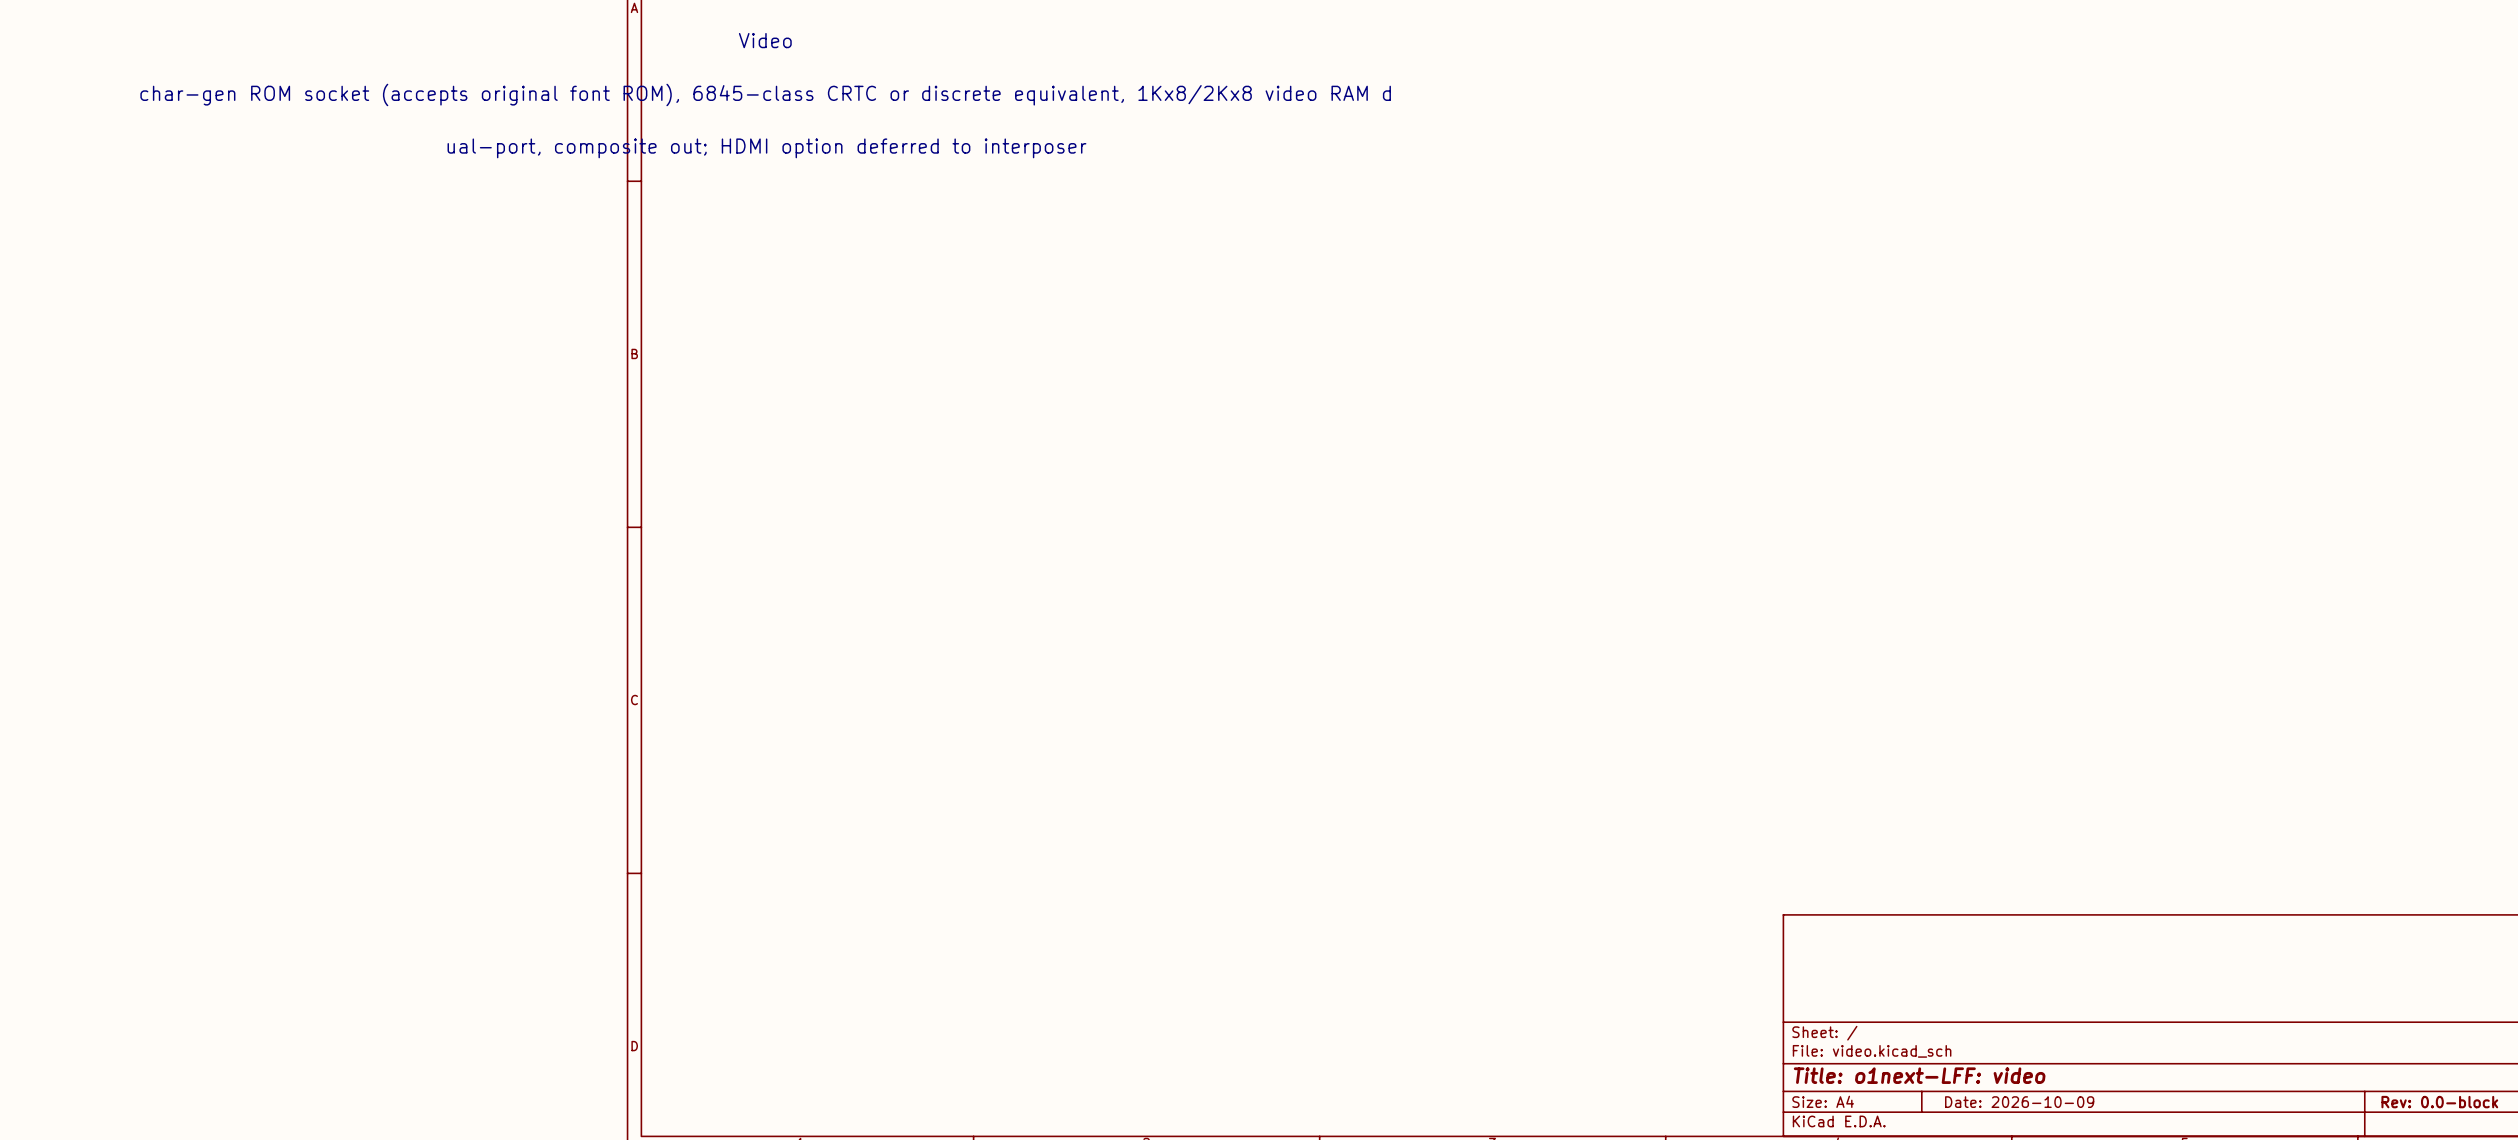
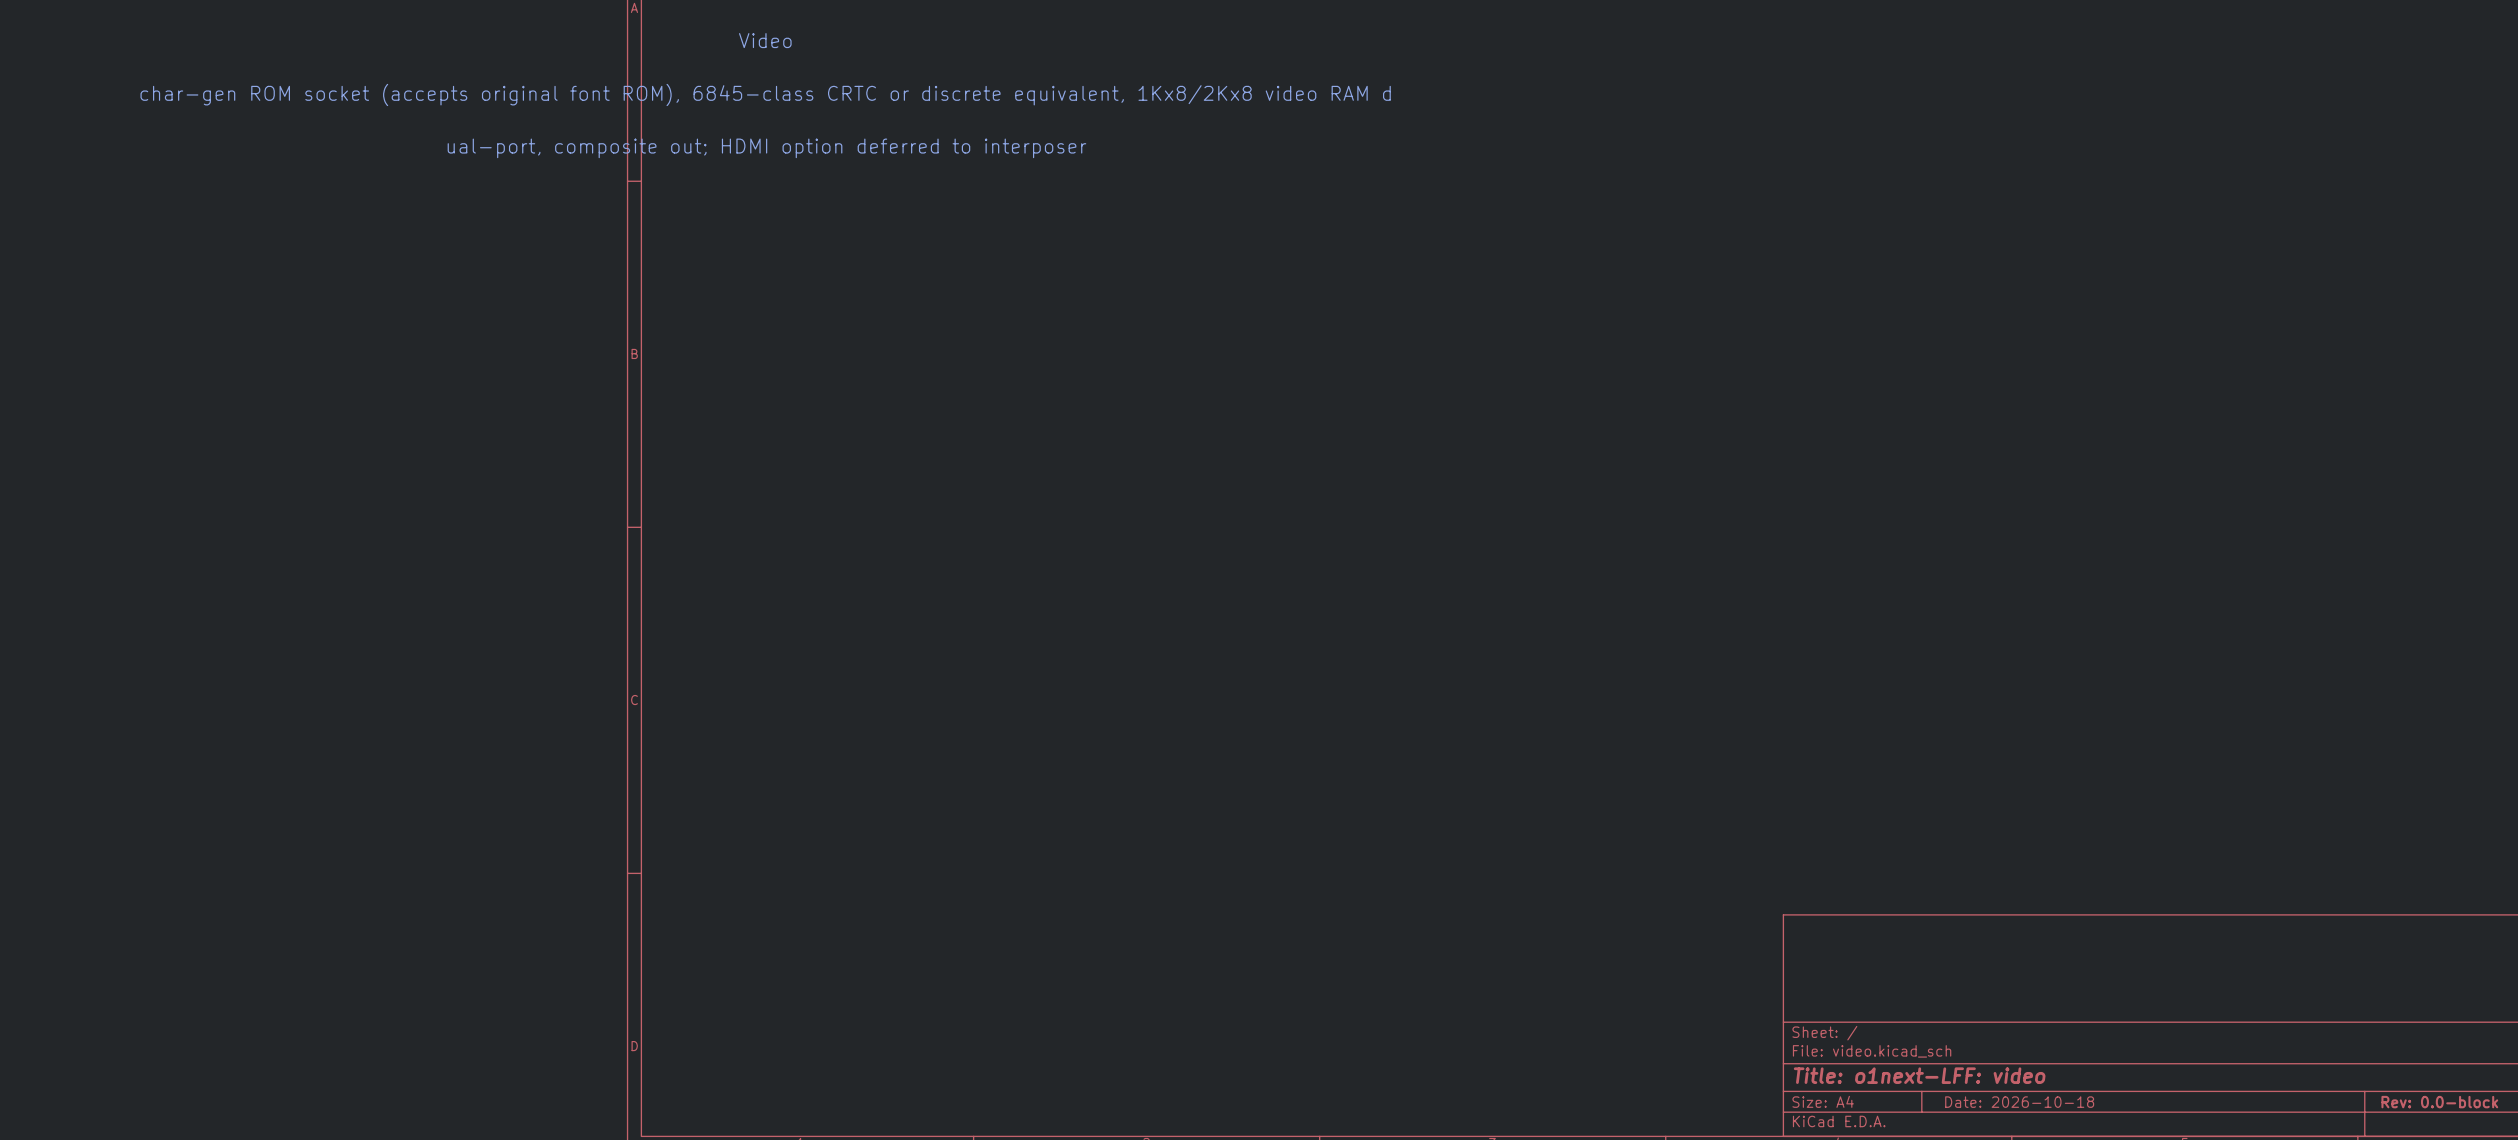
title block: Date: 2026-10-09 (2019, 1102) -> Date: 2026-10-18 (2019, 1102)

